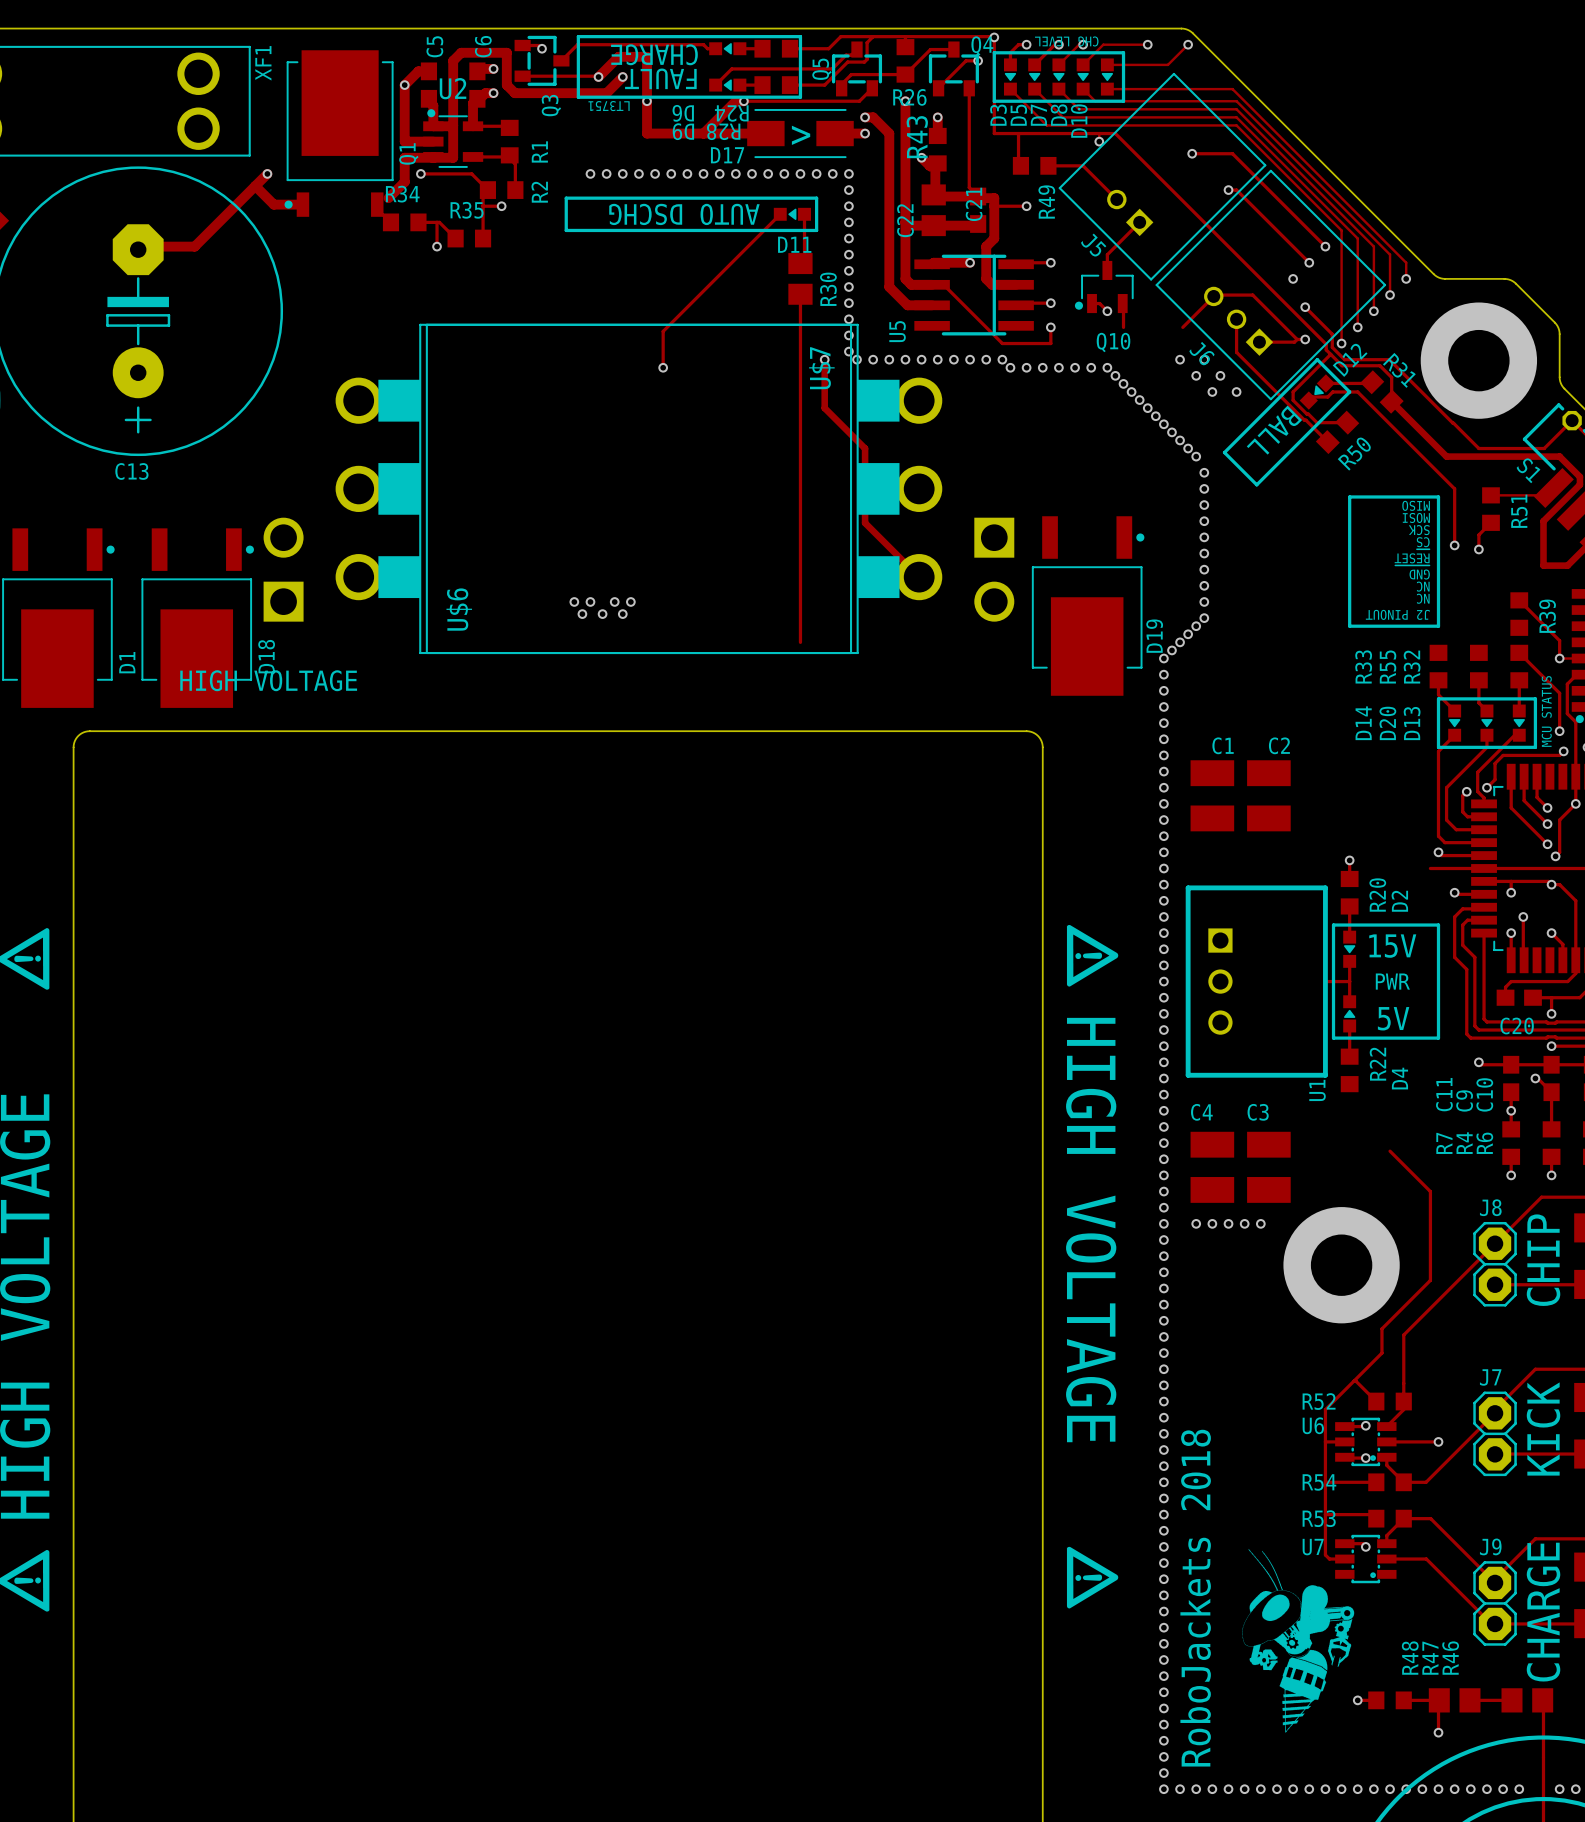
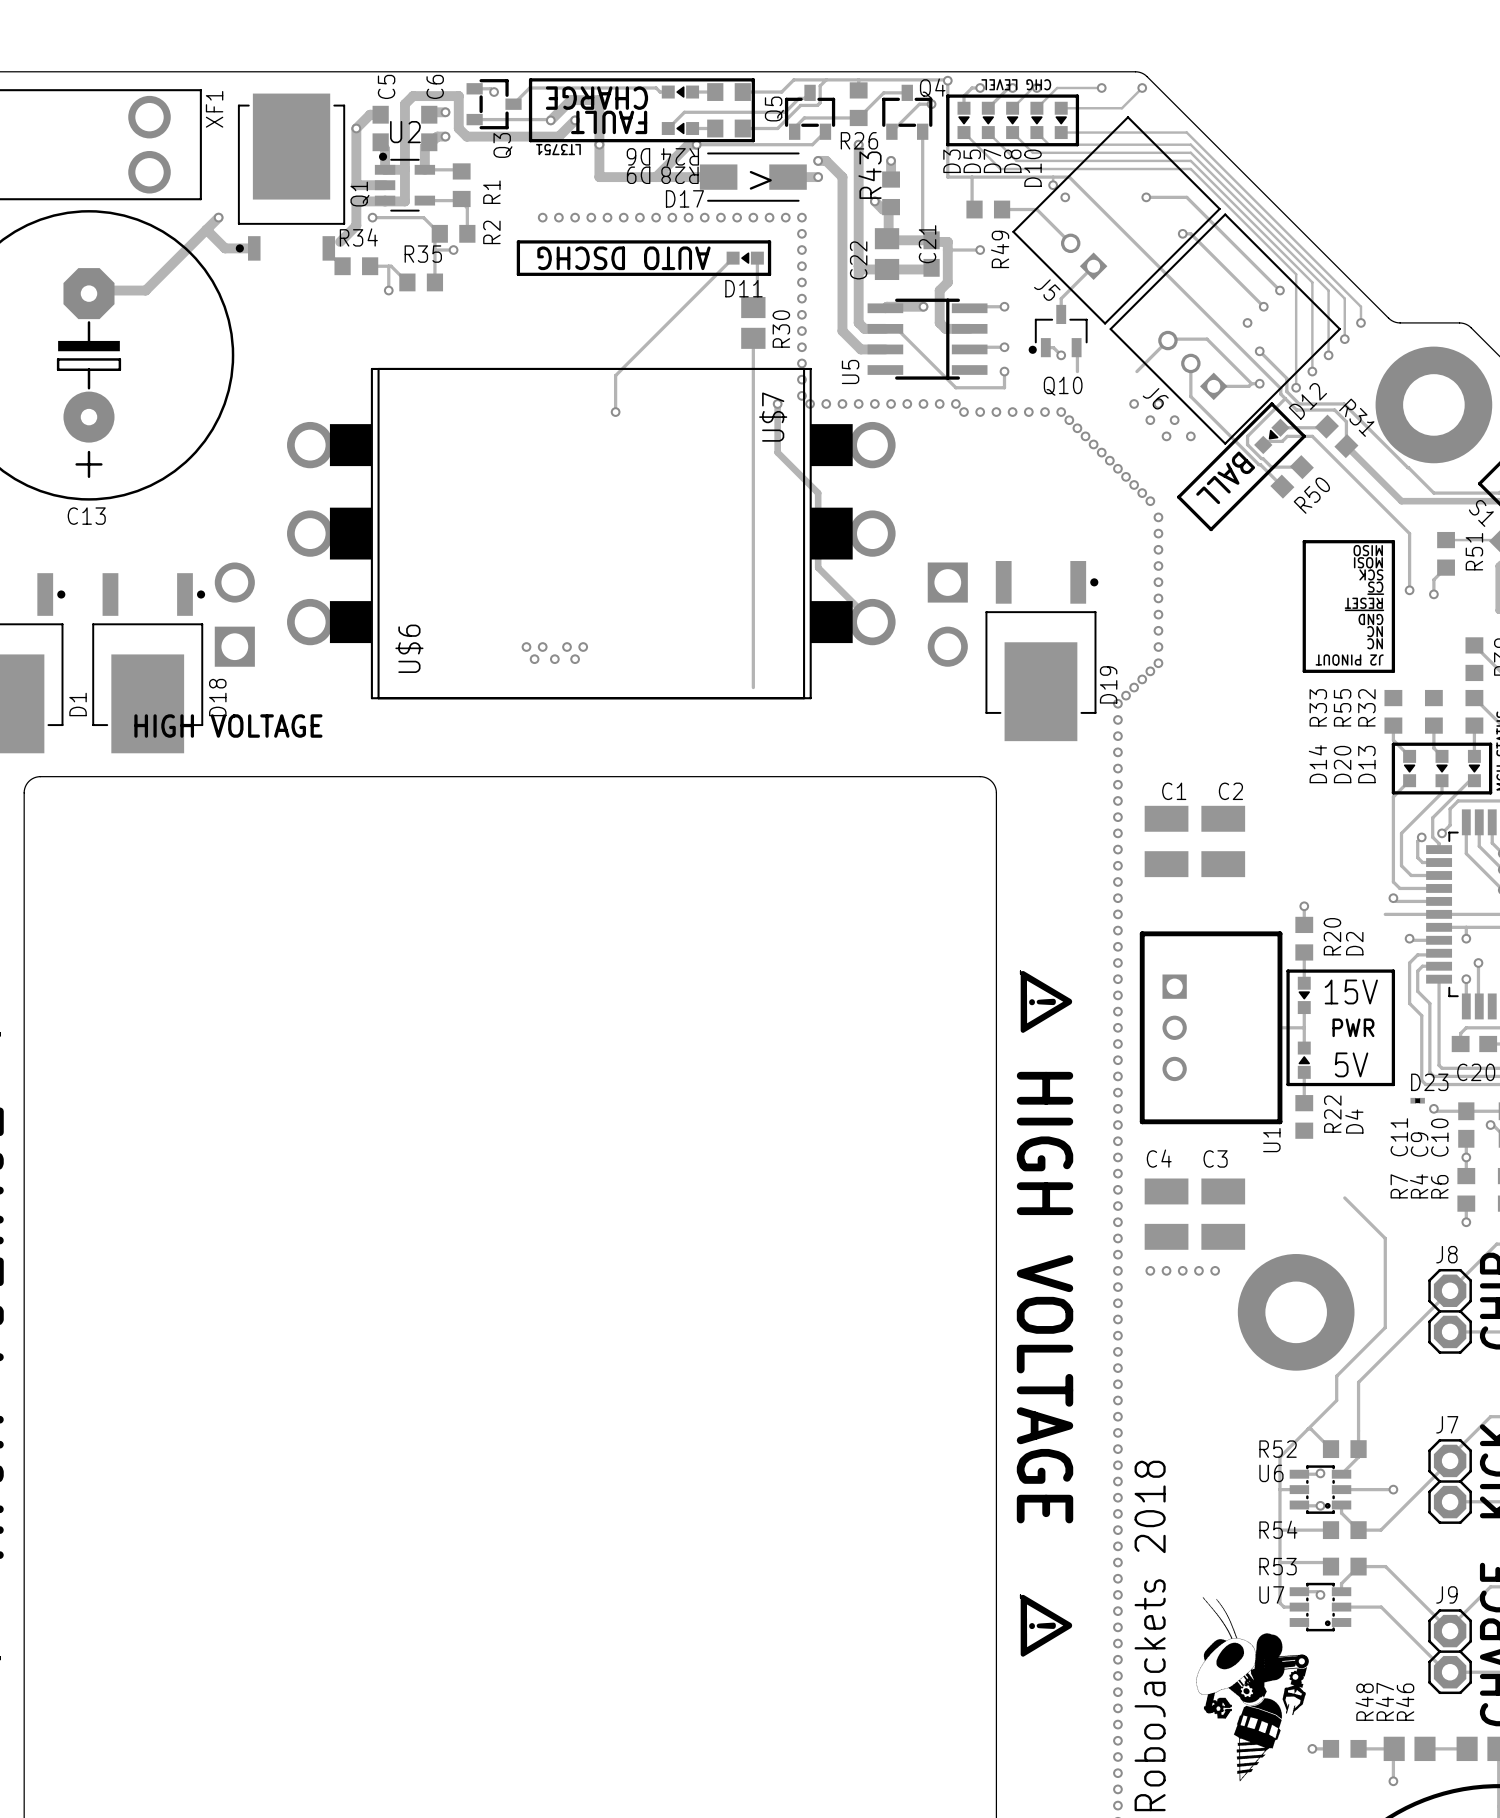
via: none -> (1065, 197)
D23: none -> (1417, 1100)

